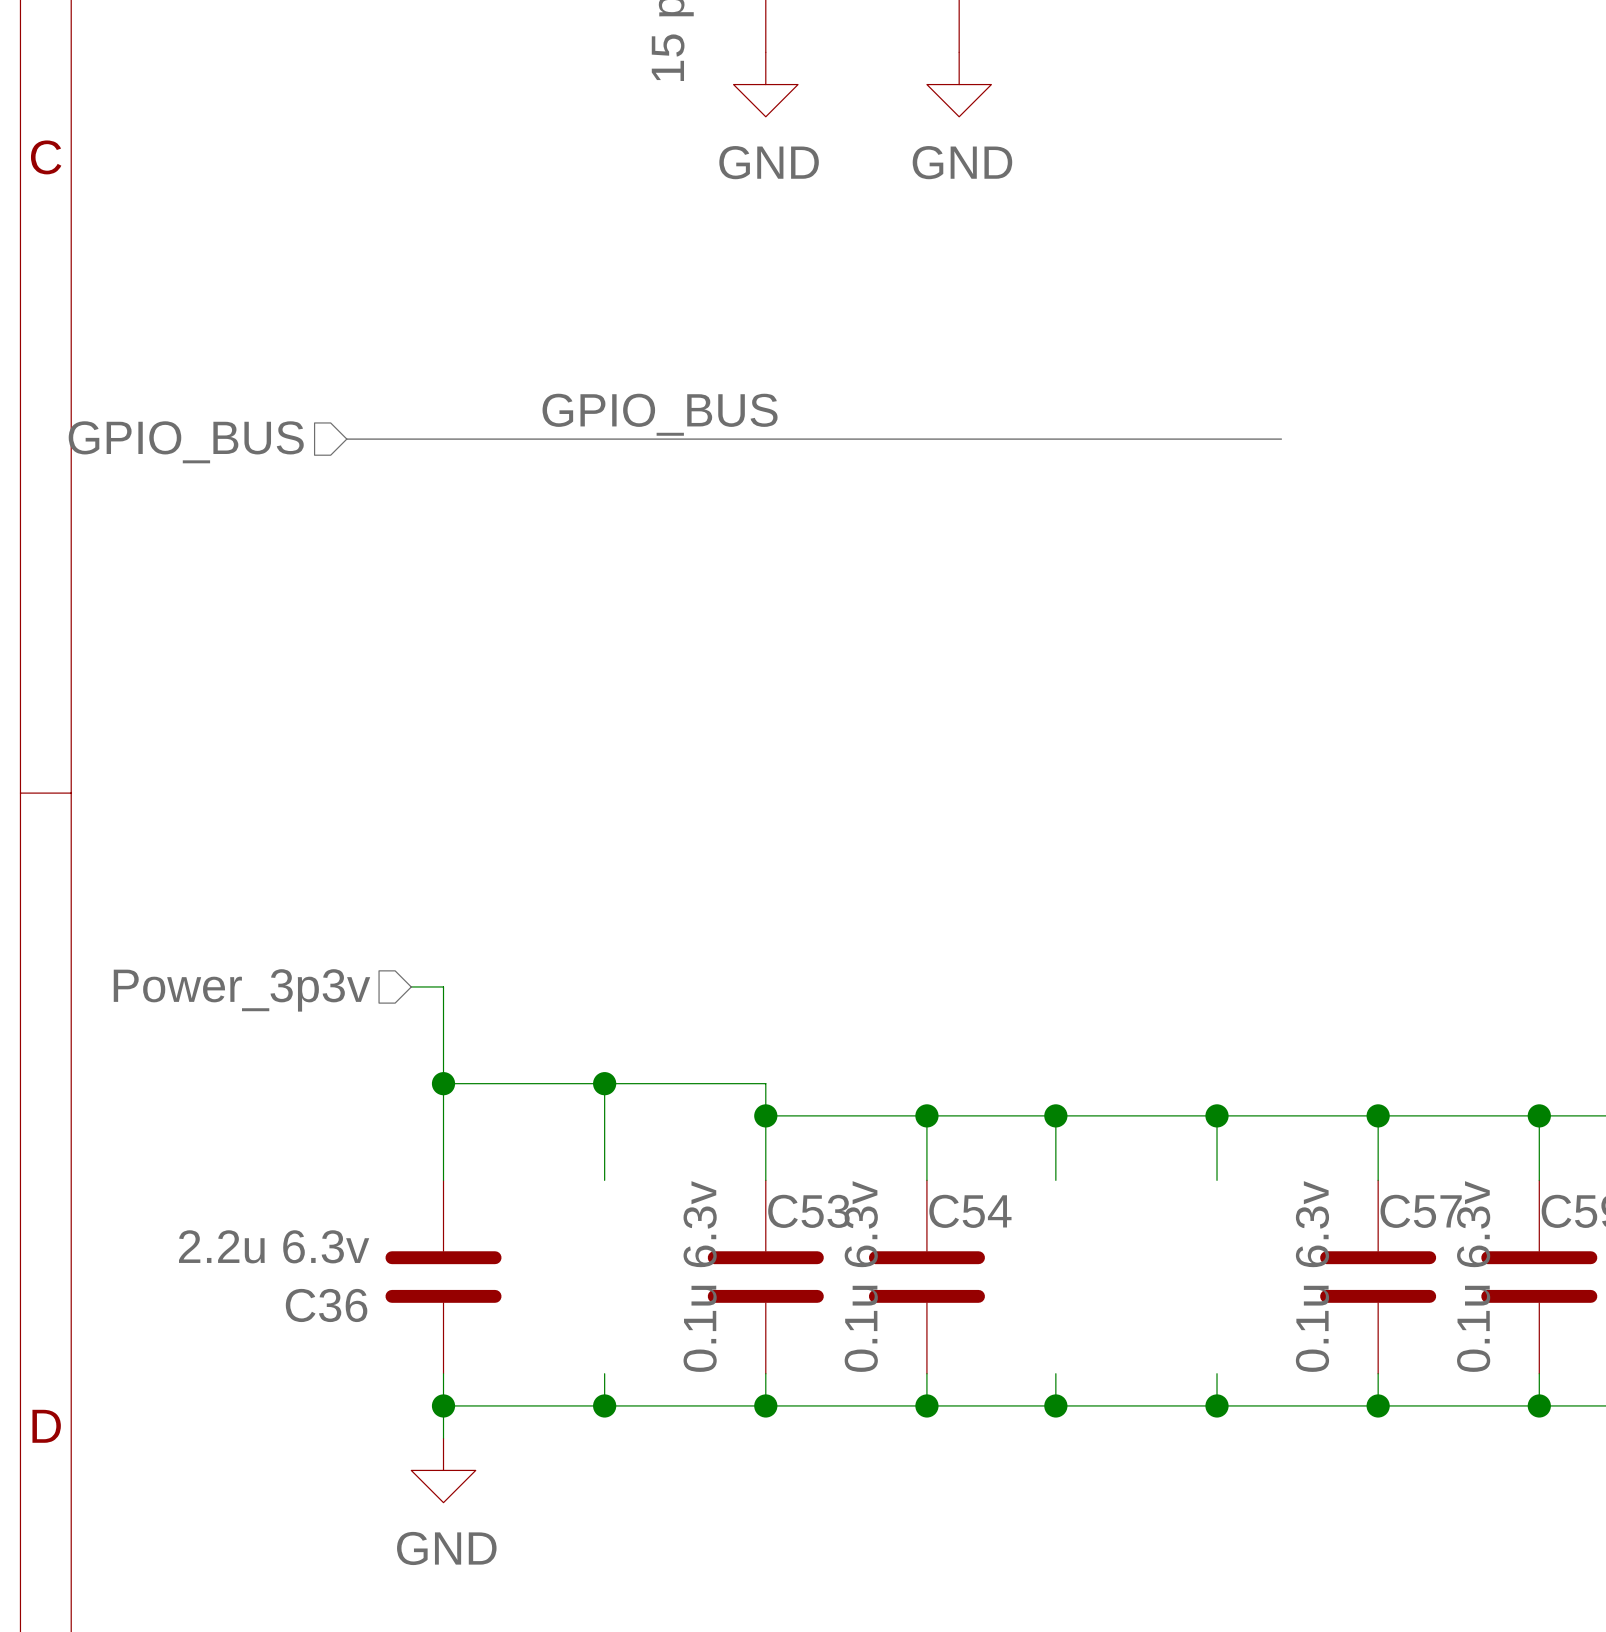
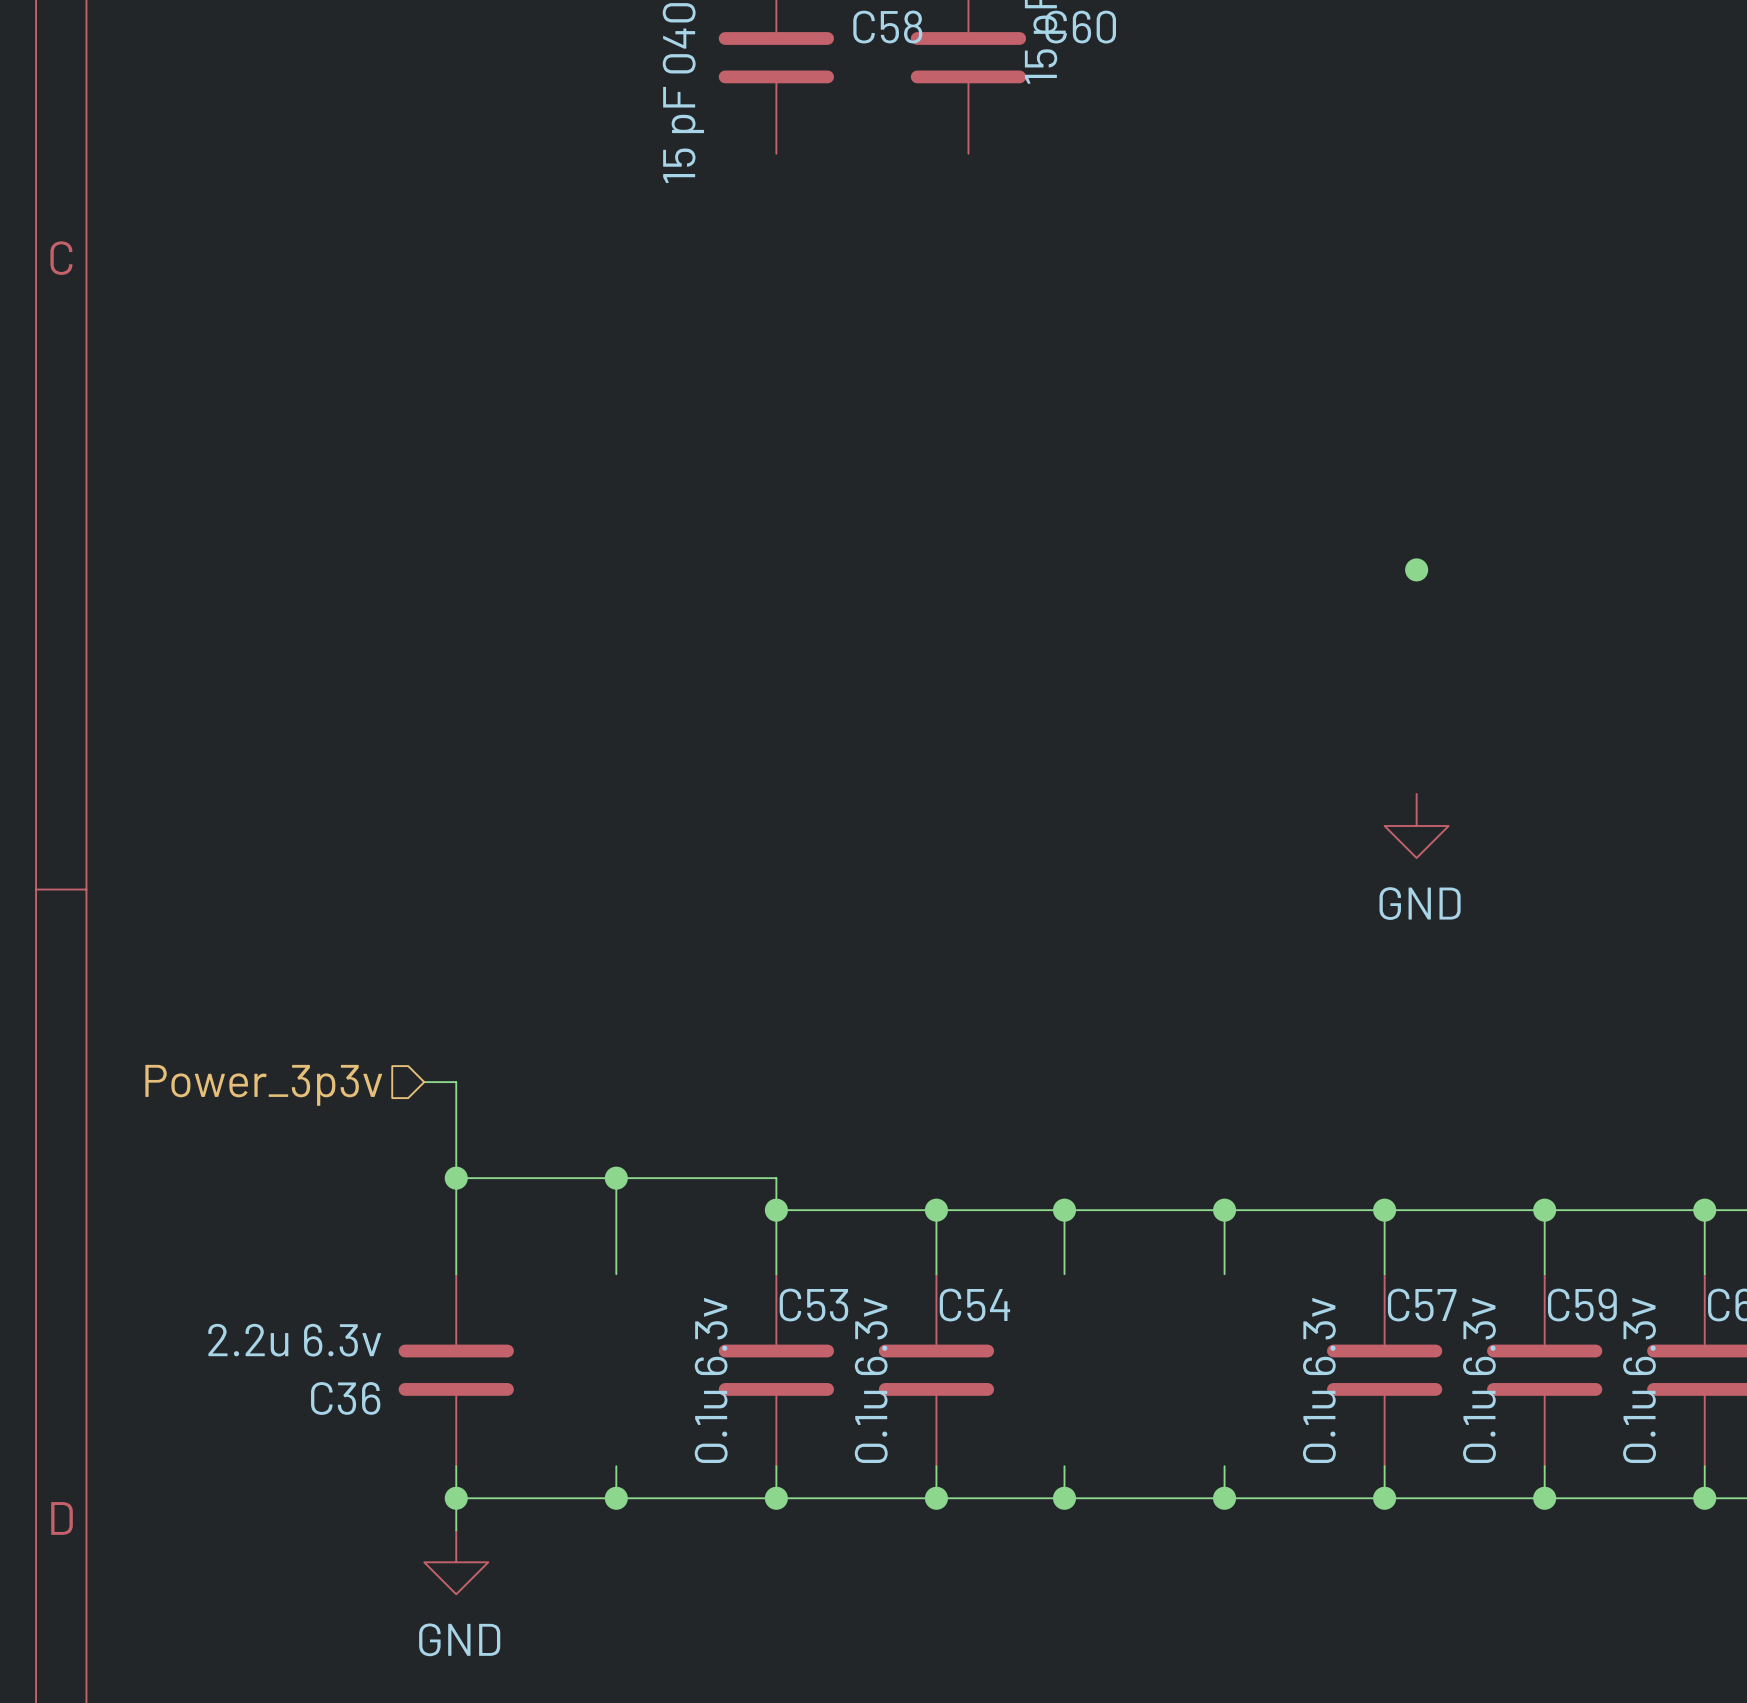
power symbol: GND (765, 84) -> none
power symbol: GND (959, 84) -> none
label: GPIO_BUS (660, 414) -> none
bus: (346, 439) (1281, 439) -> none
hierarchical label: GPIO_BUS (186, 442) -> none
junction: none -> (1416, 569)
power symbol: none -> GND (1416, 826)

